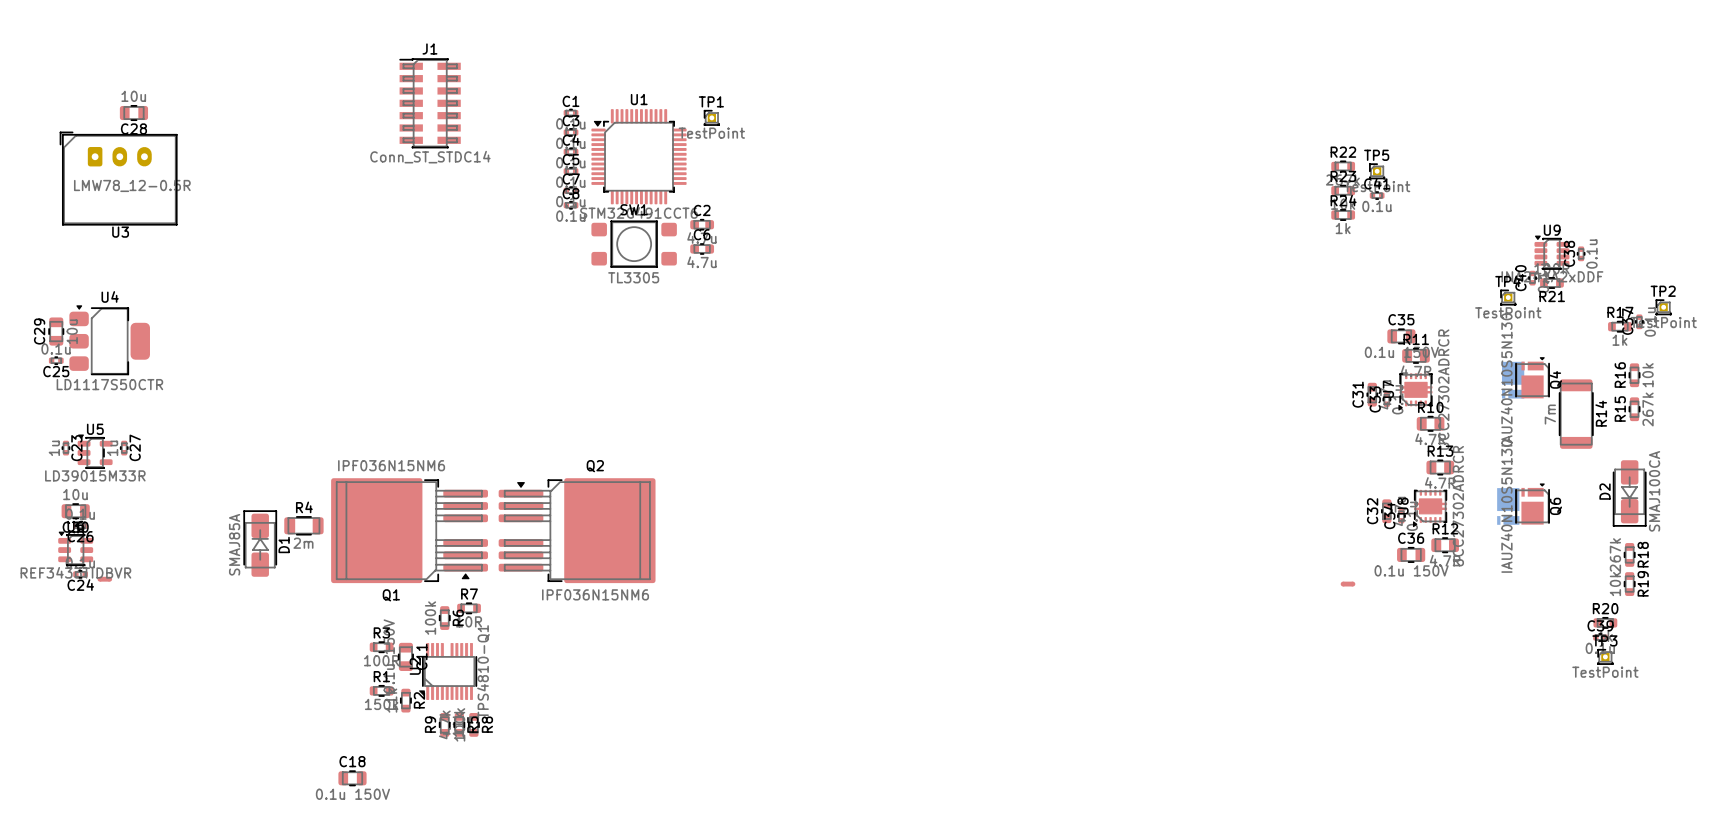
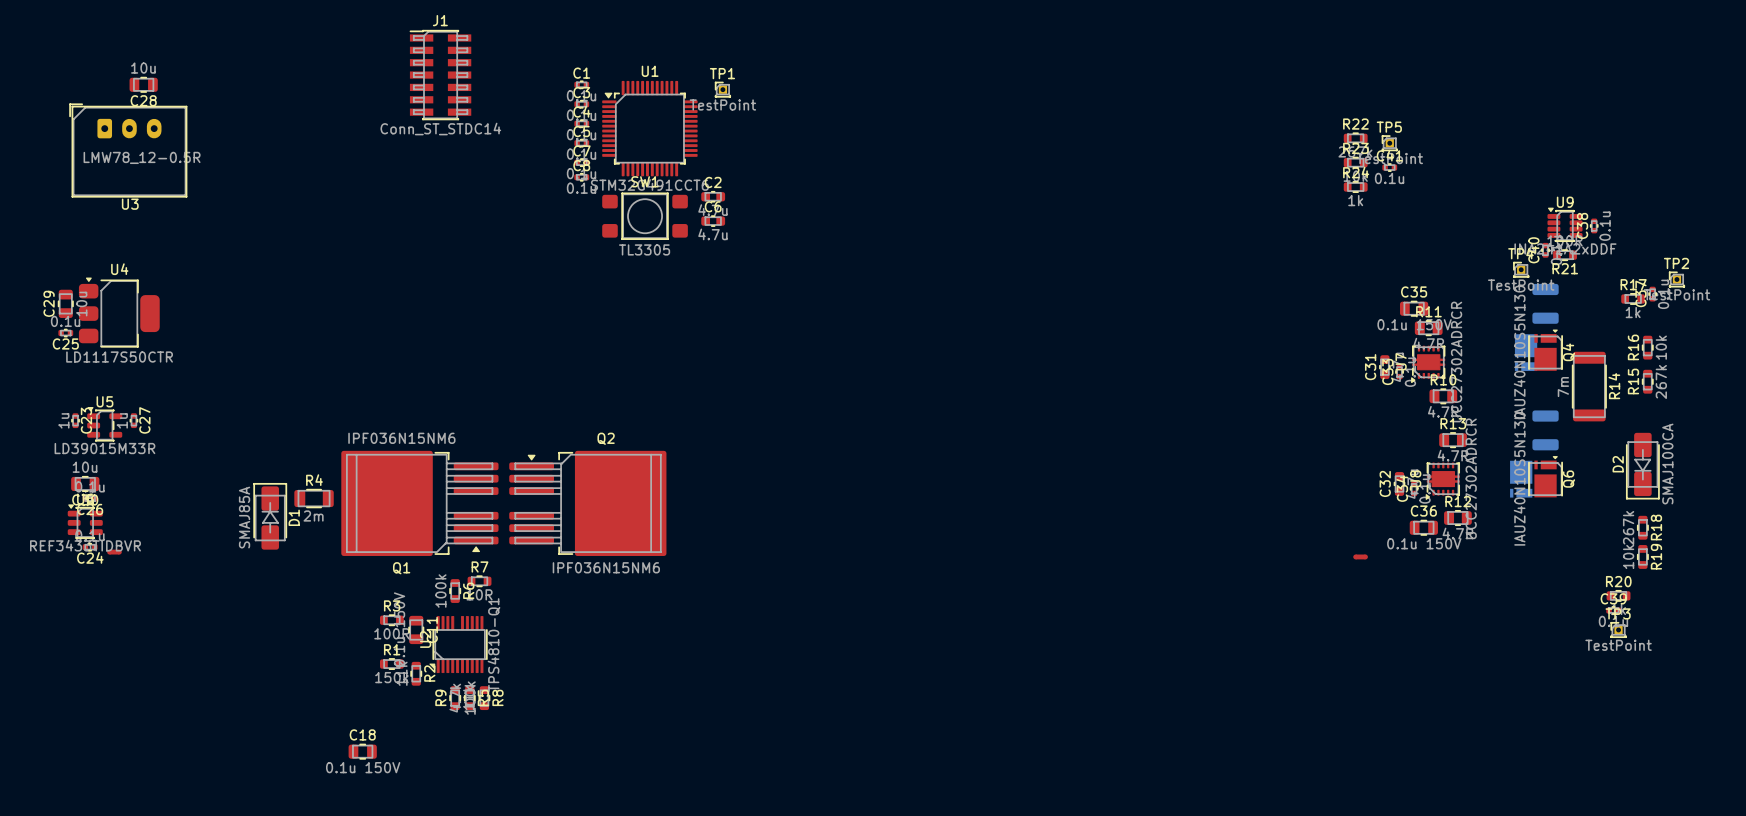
part: none -> (1545, 303)
part: none -> (1545, 430)

